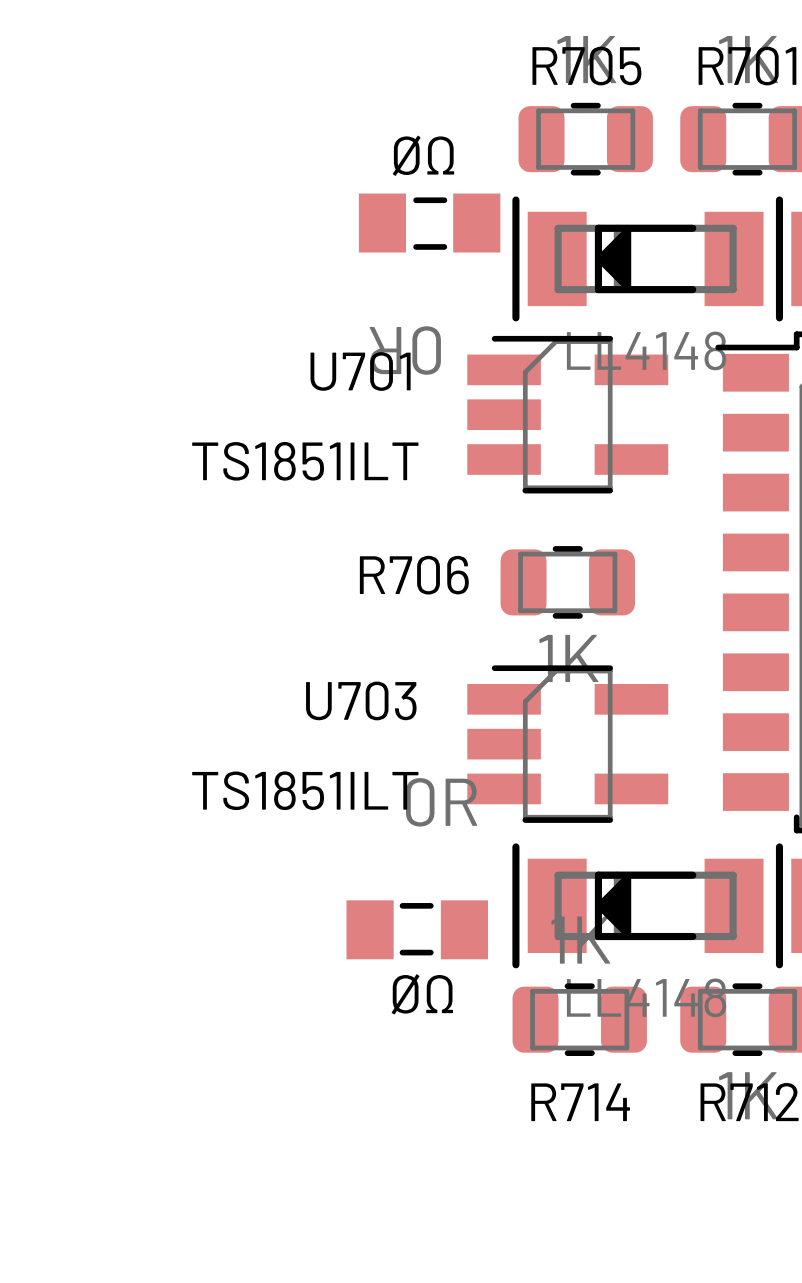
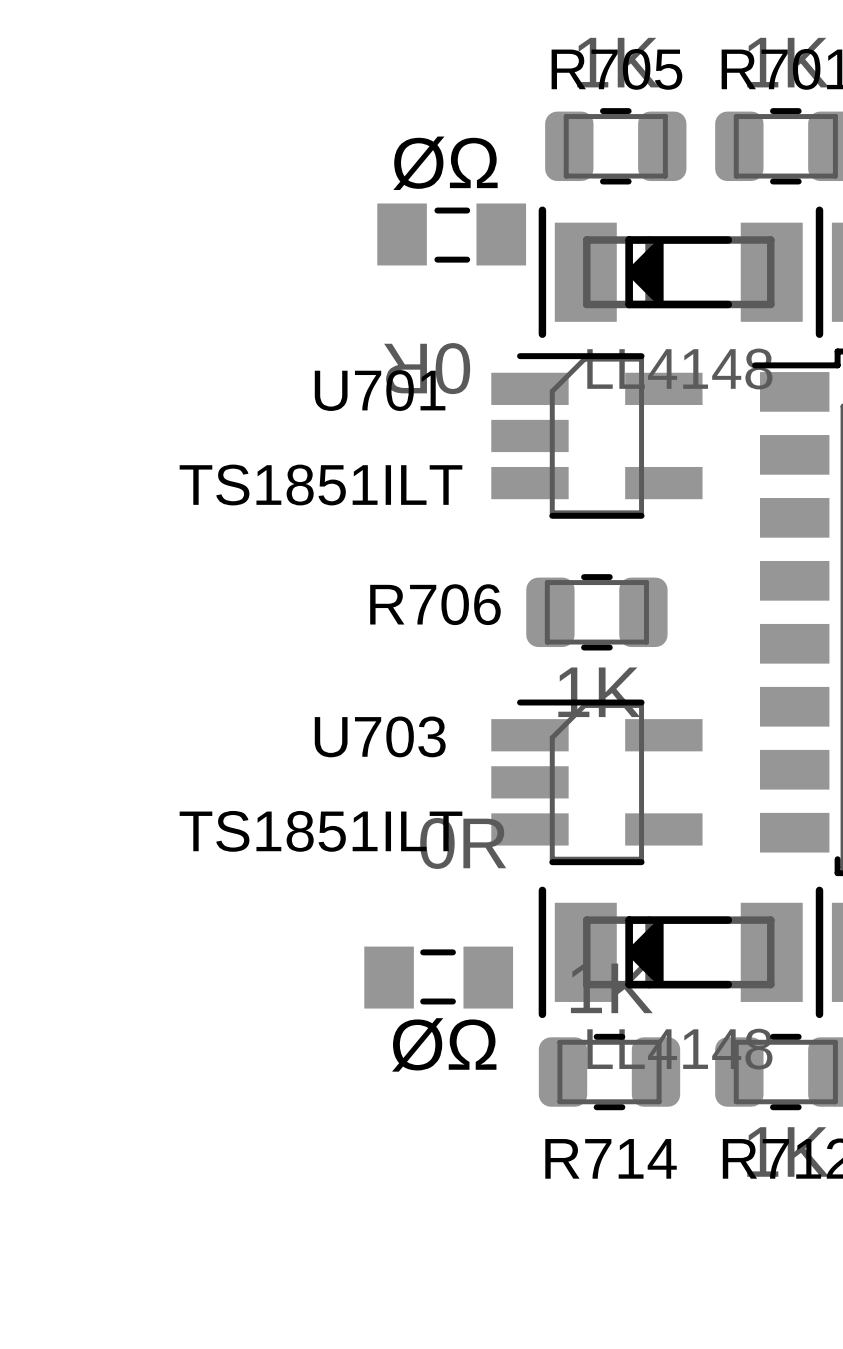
part footprint: [358, 193, 501, 253] -> [377, 203, 527, 266]
part footprint: [346, 900, 489, 960] -> [364, 946, 514, 1009]

